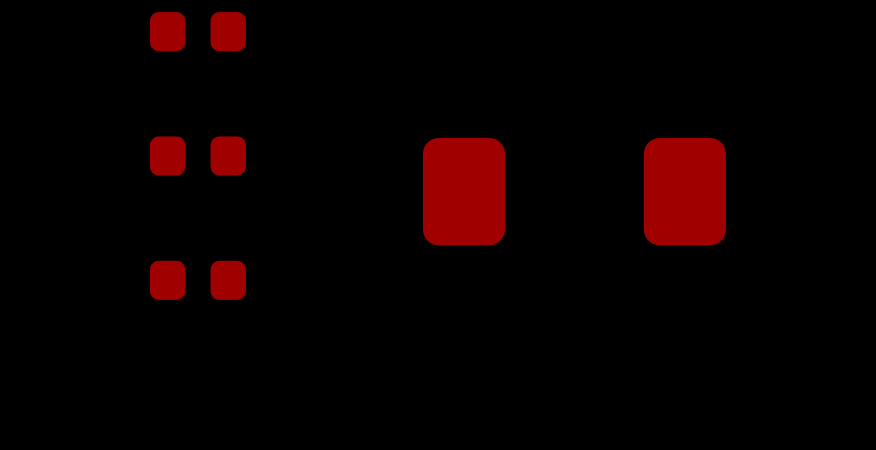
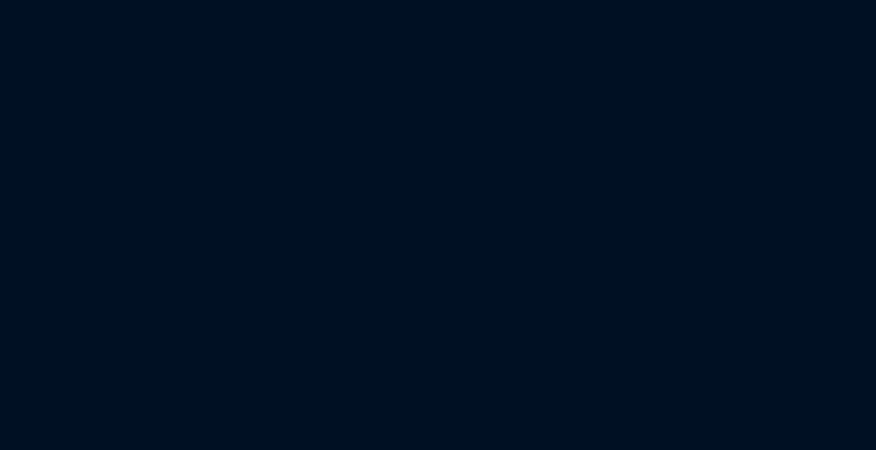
part: (197, 31) -> none
part: (197, 155) -> none
part: (574, 191) -> none
part: (197, 280) -> none

